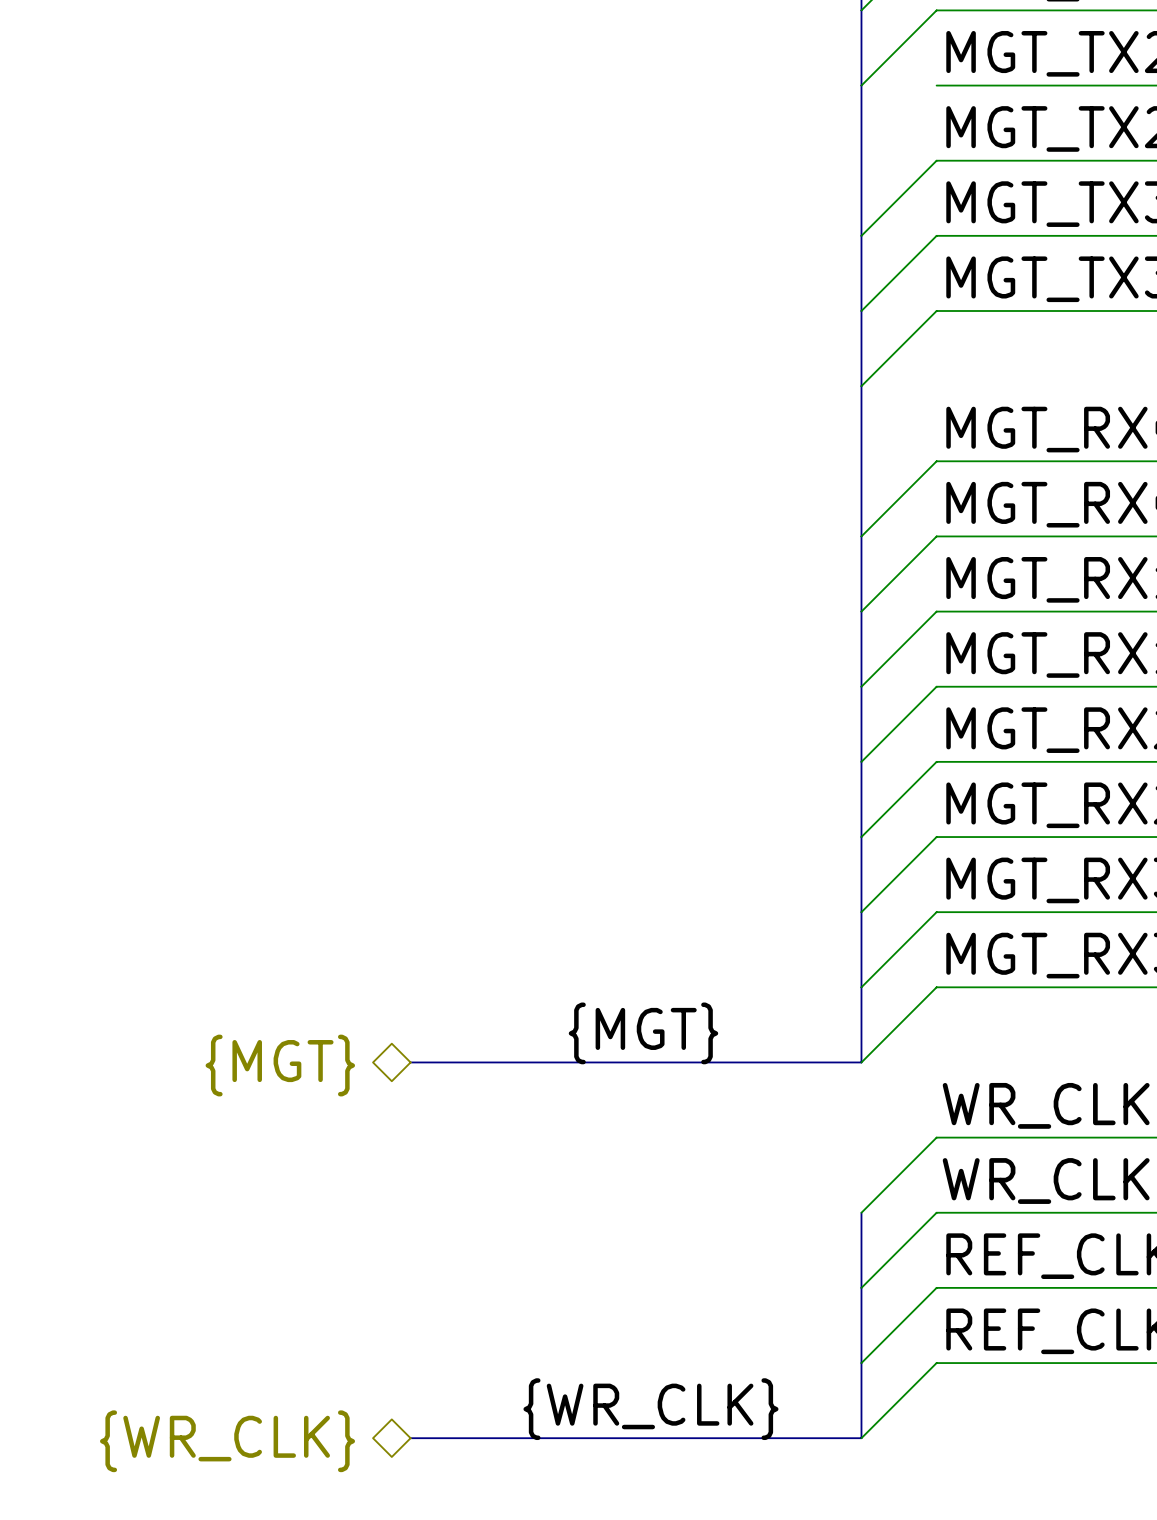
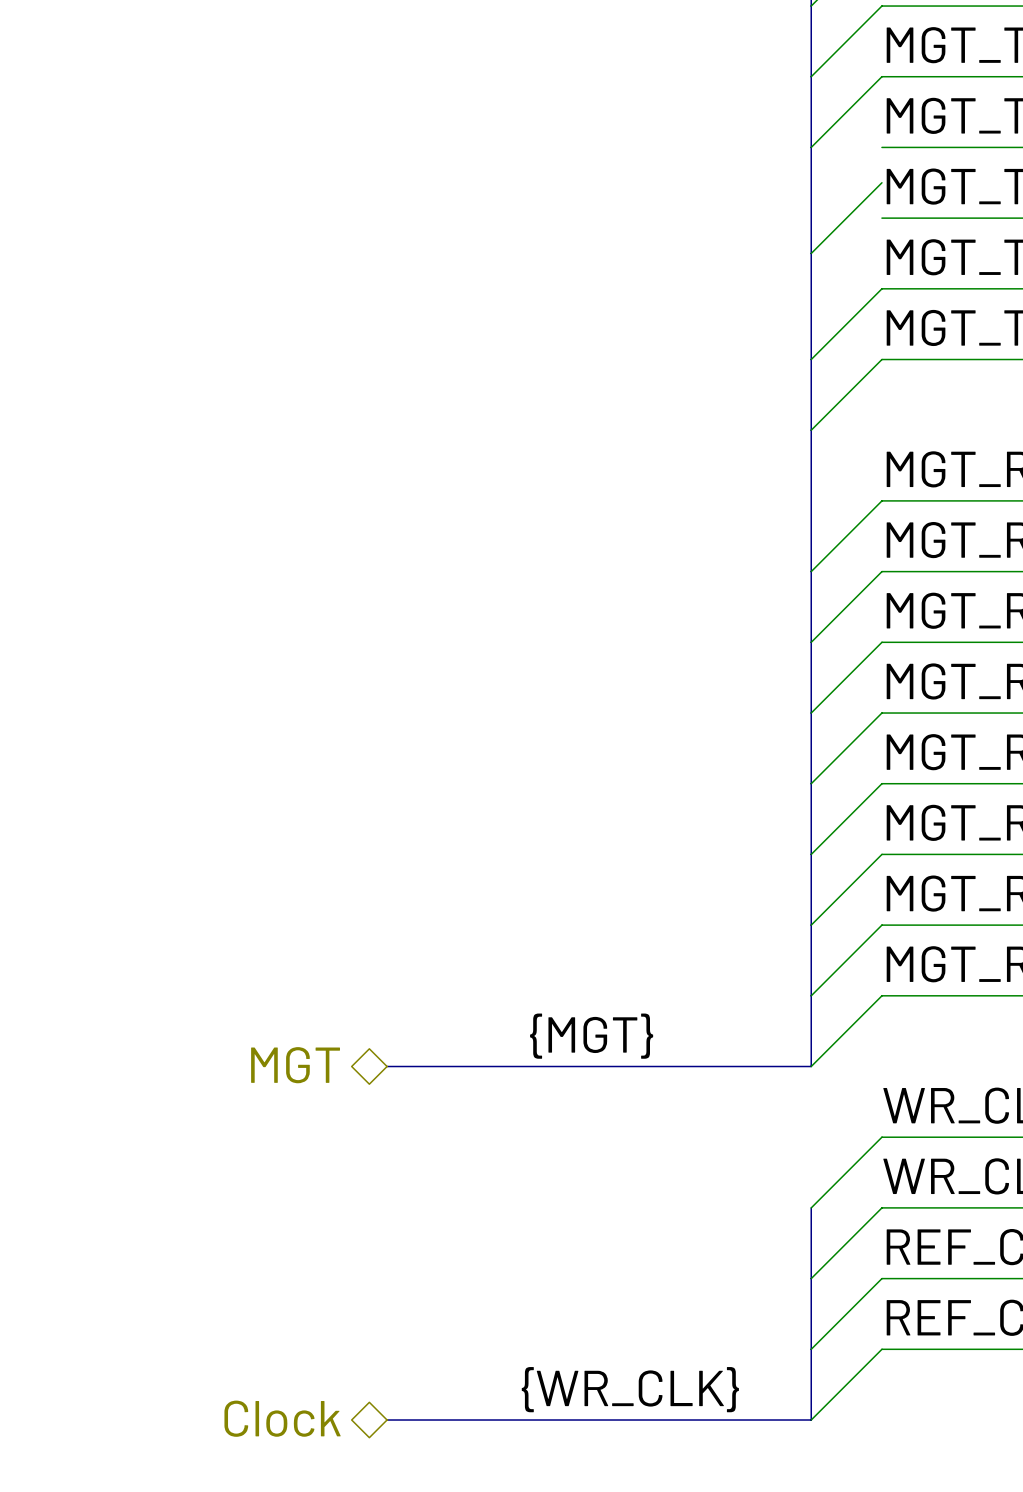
wire: (936, 160) (861, 235) -> (881, 182) (811, 253)
hierarchical label: {MGT} (280, 1065) -> MGT (295, 1065)
hierarchical label: {WR_CLK} (227, 1441) -> Clock (282, 1418)

